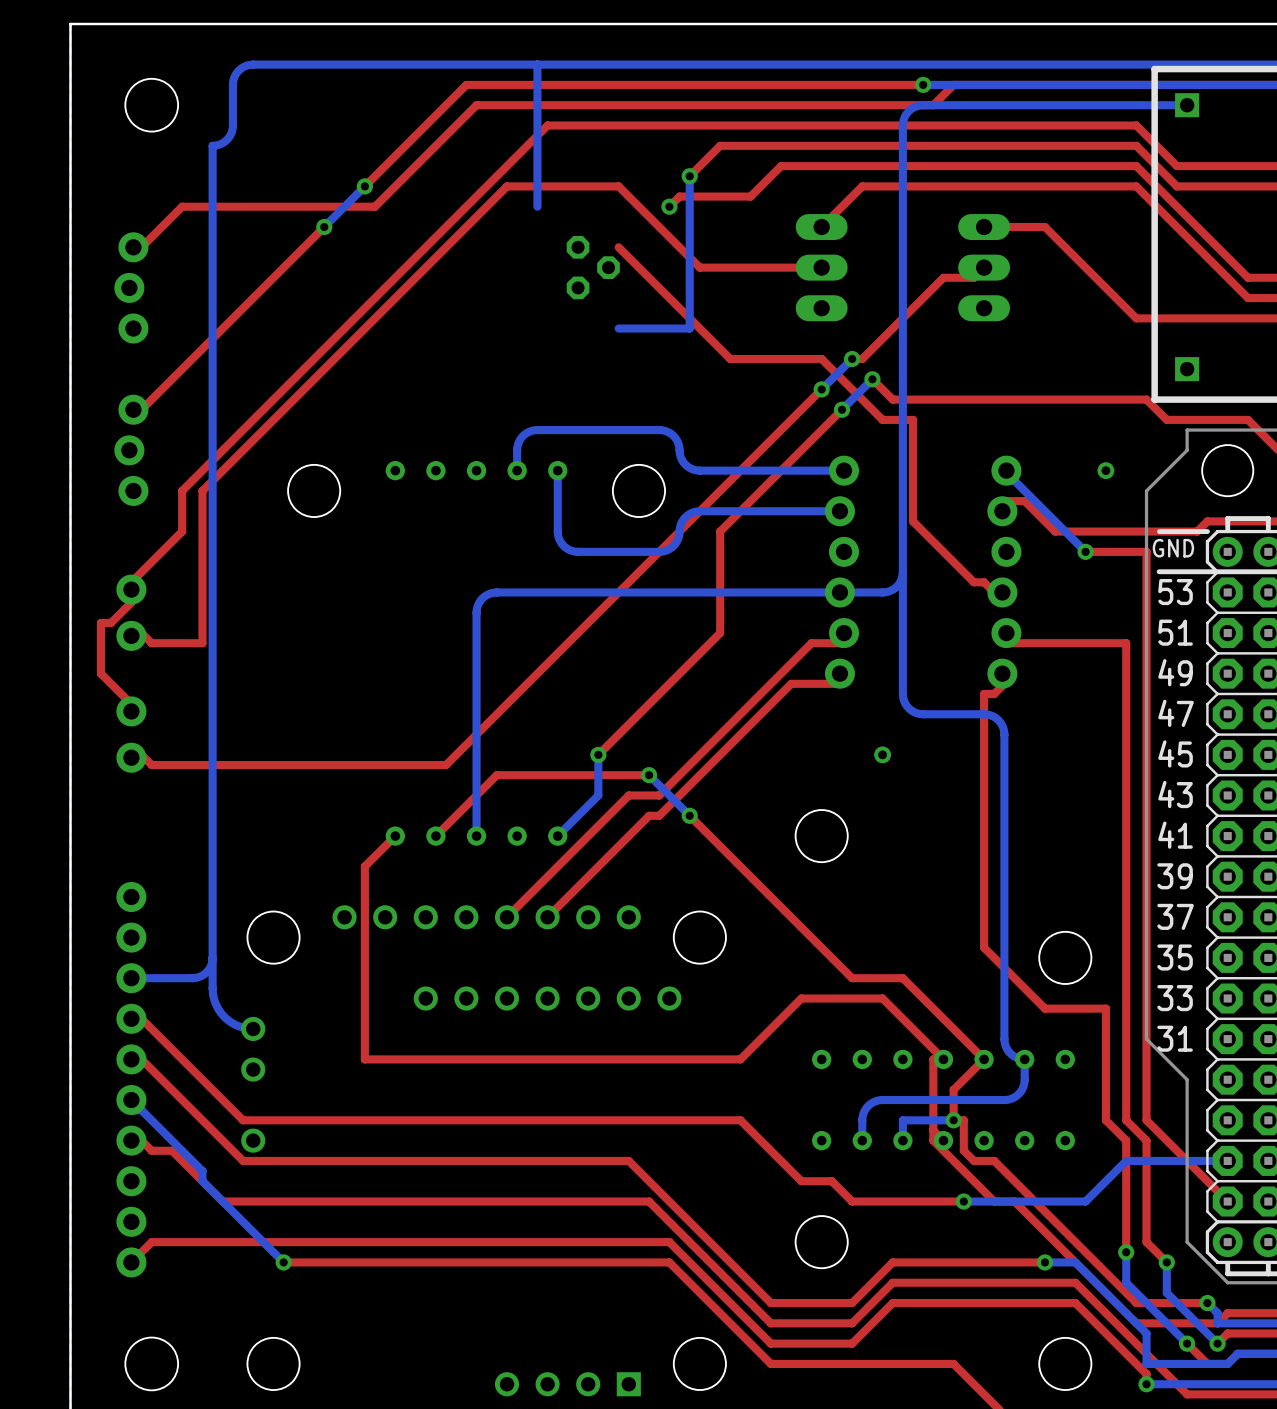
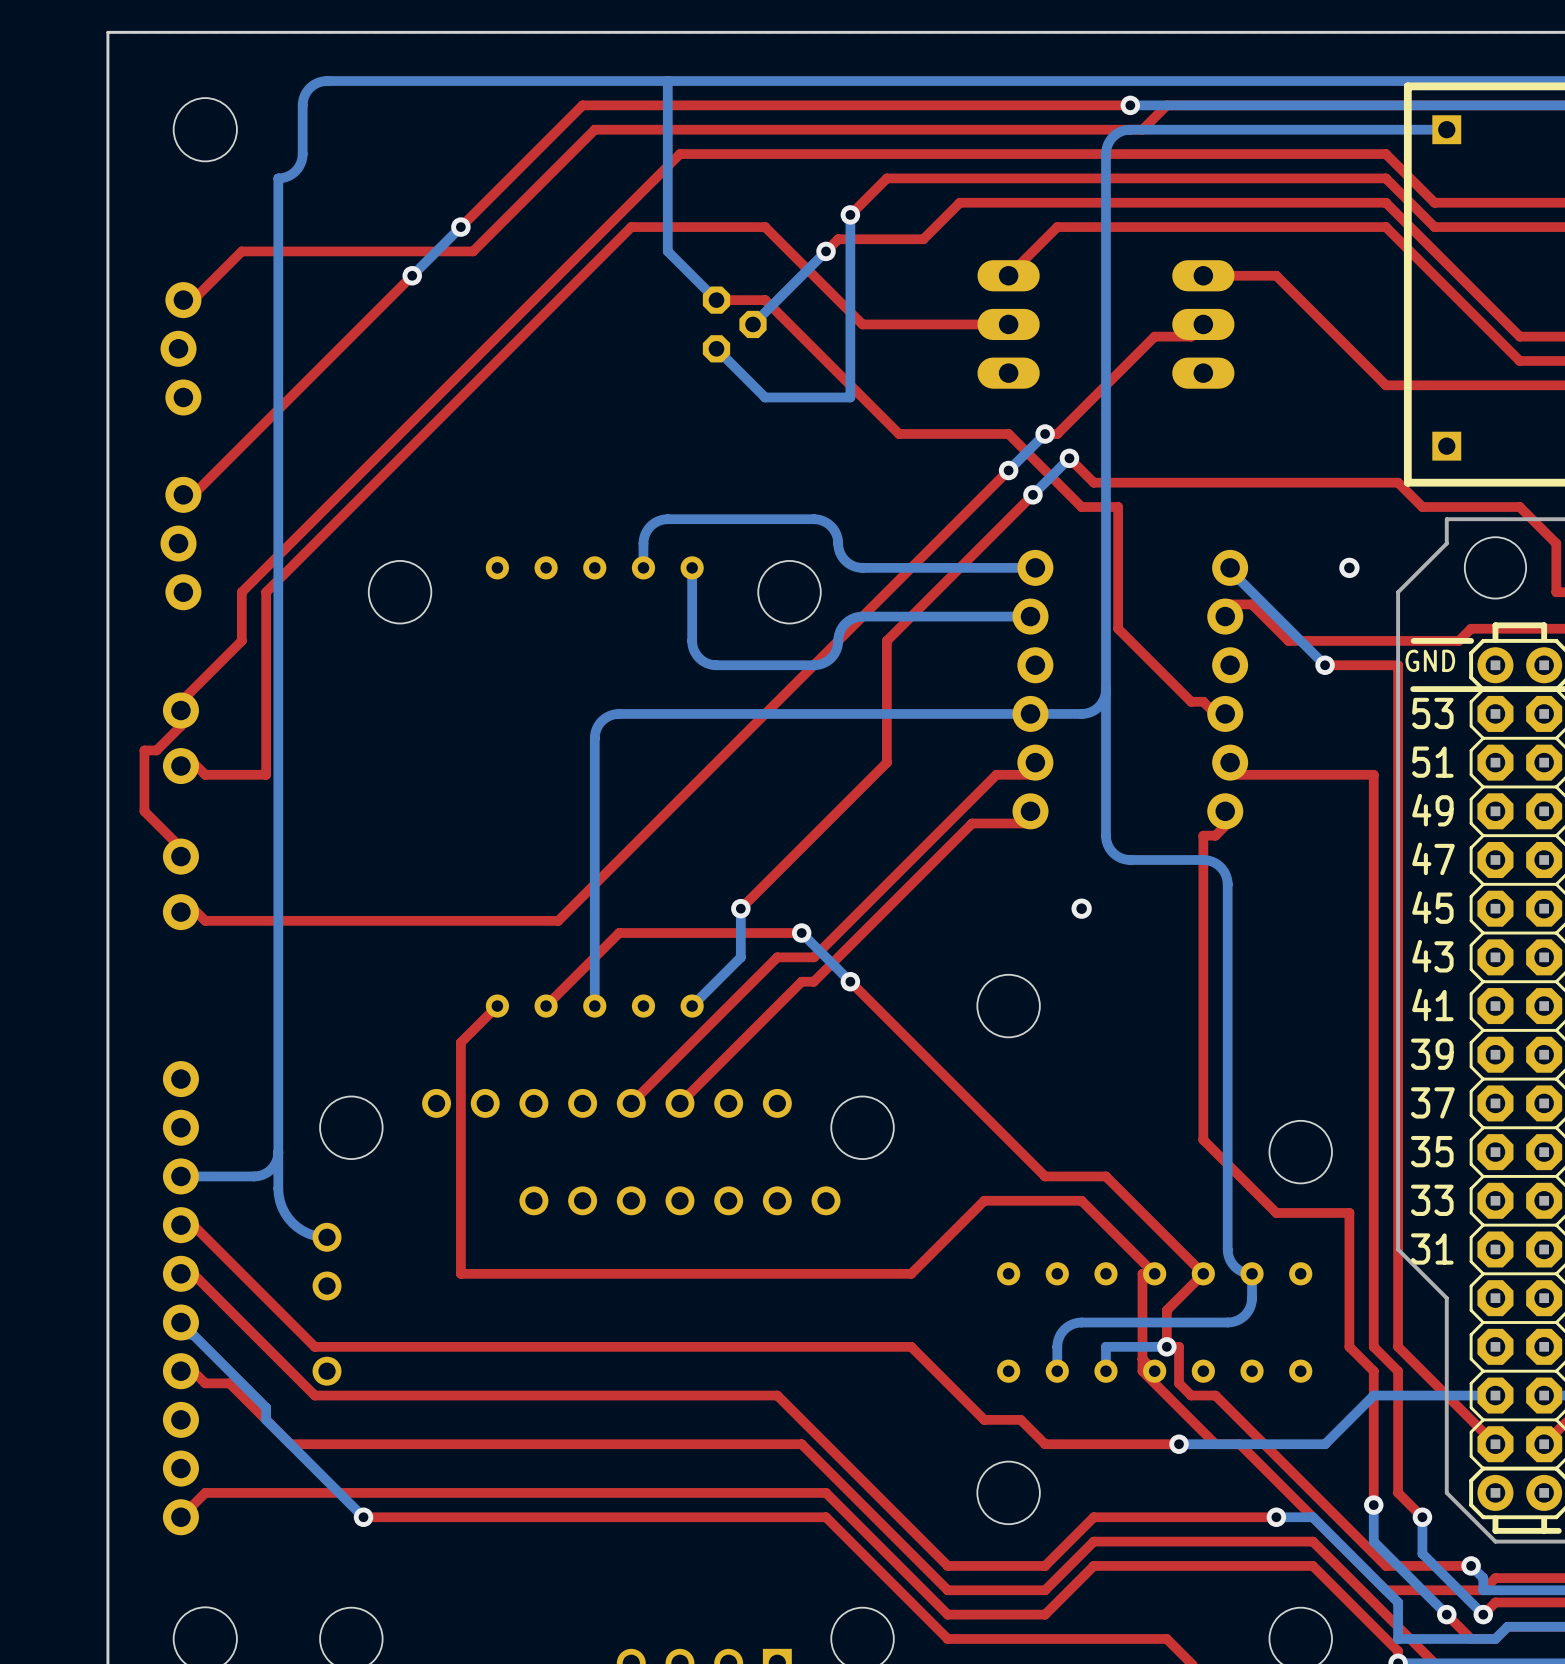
bottom track: none -> (667, 251) (716, 300)
bottom track: none -> (826, 251) (753, 324)
top track: none -> (765, 300) (716, 300)
bottom track: none -> (716, 348) (765, 397)

